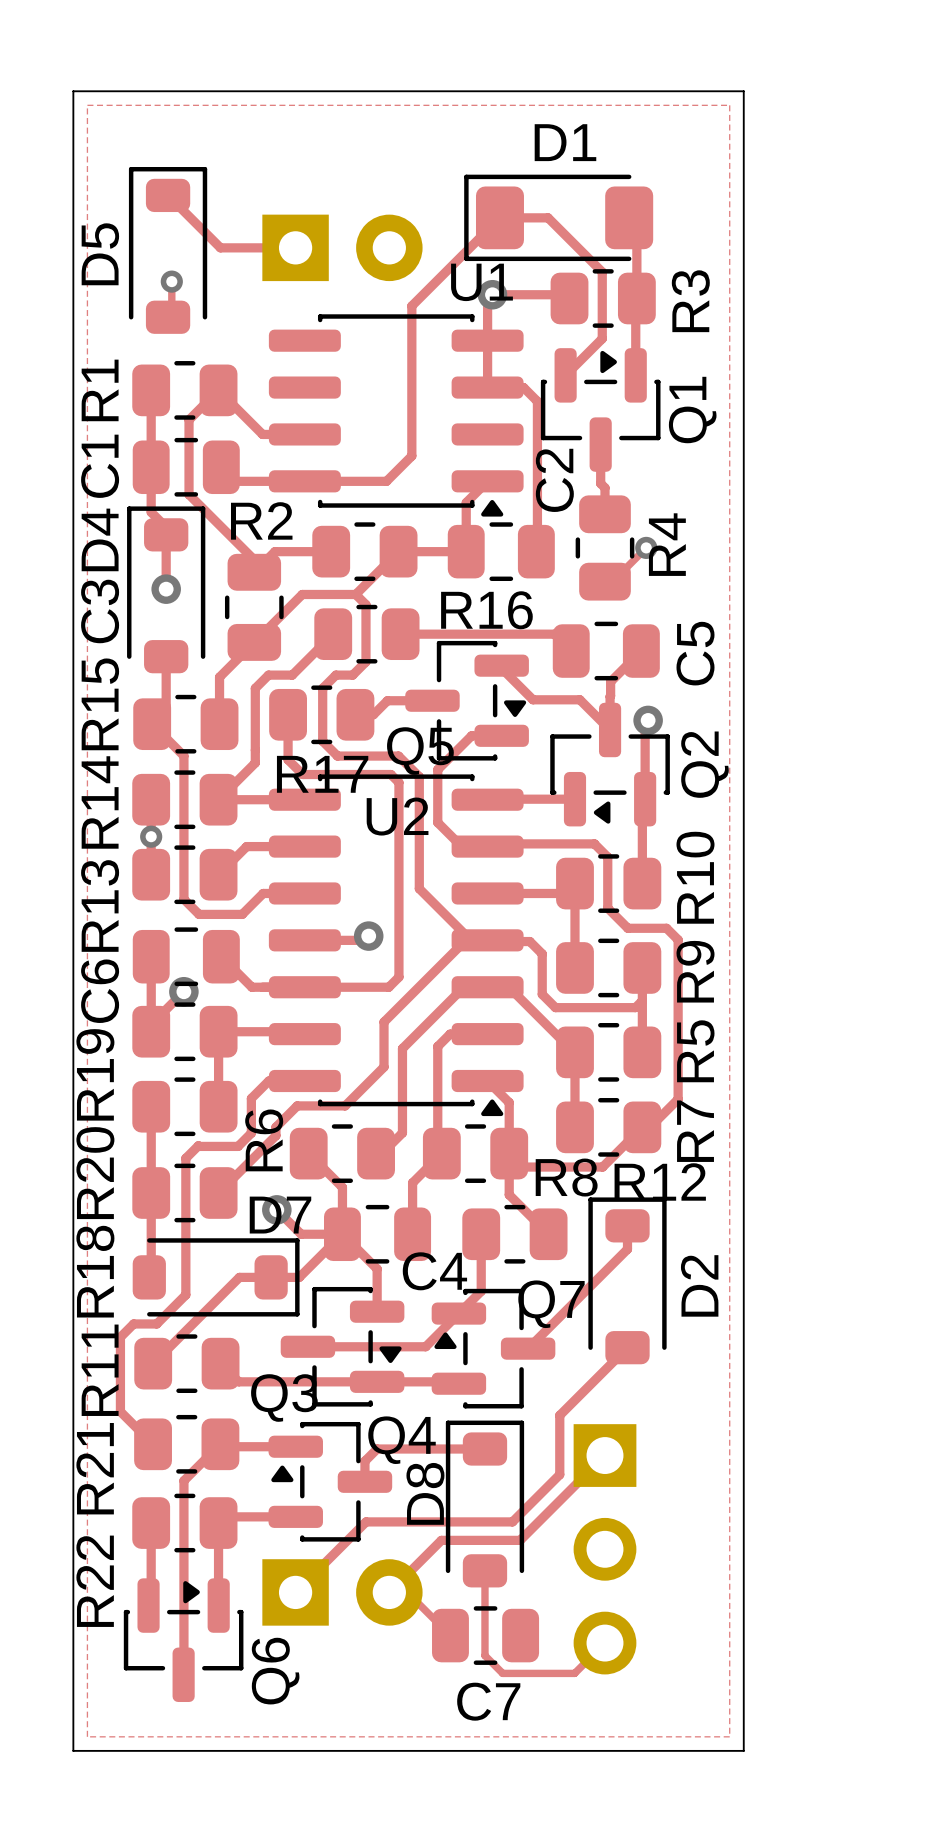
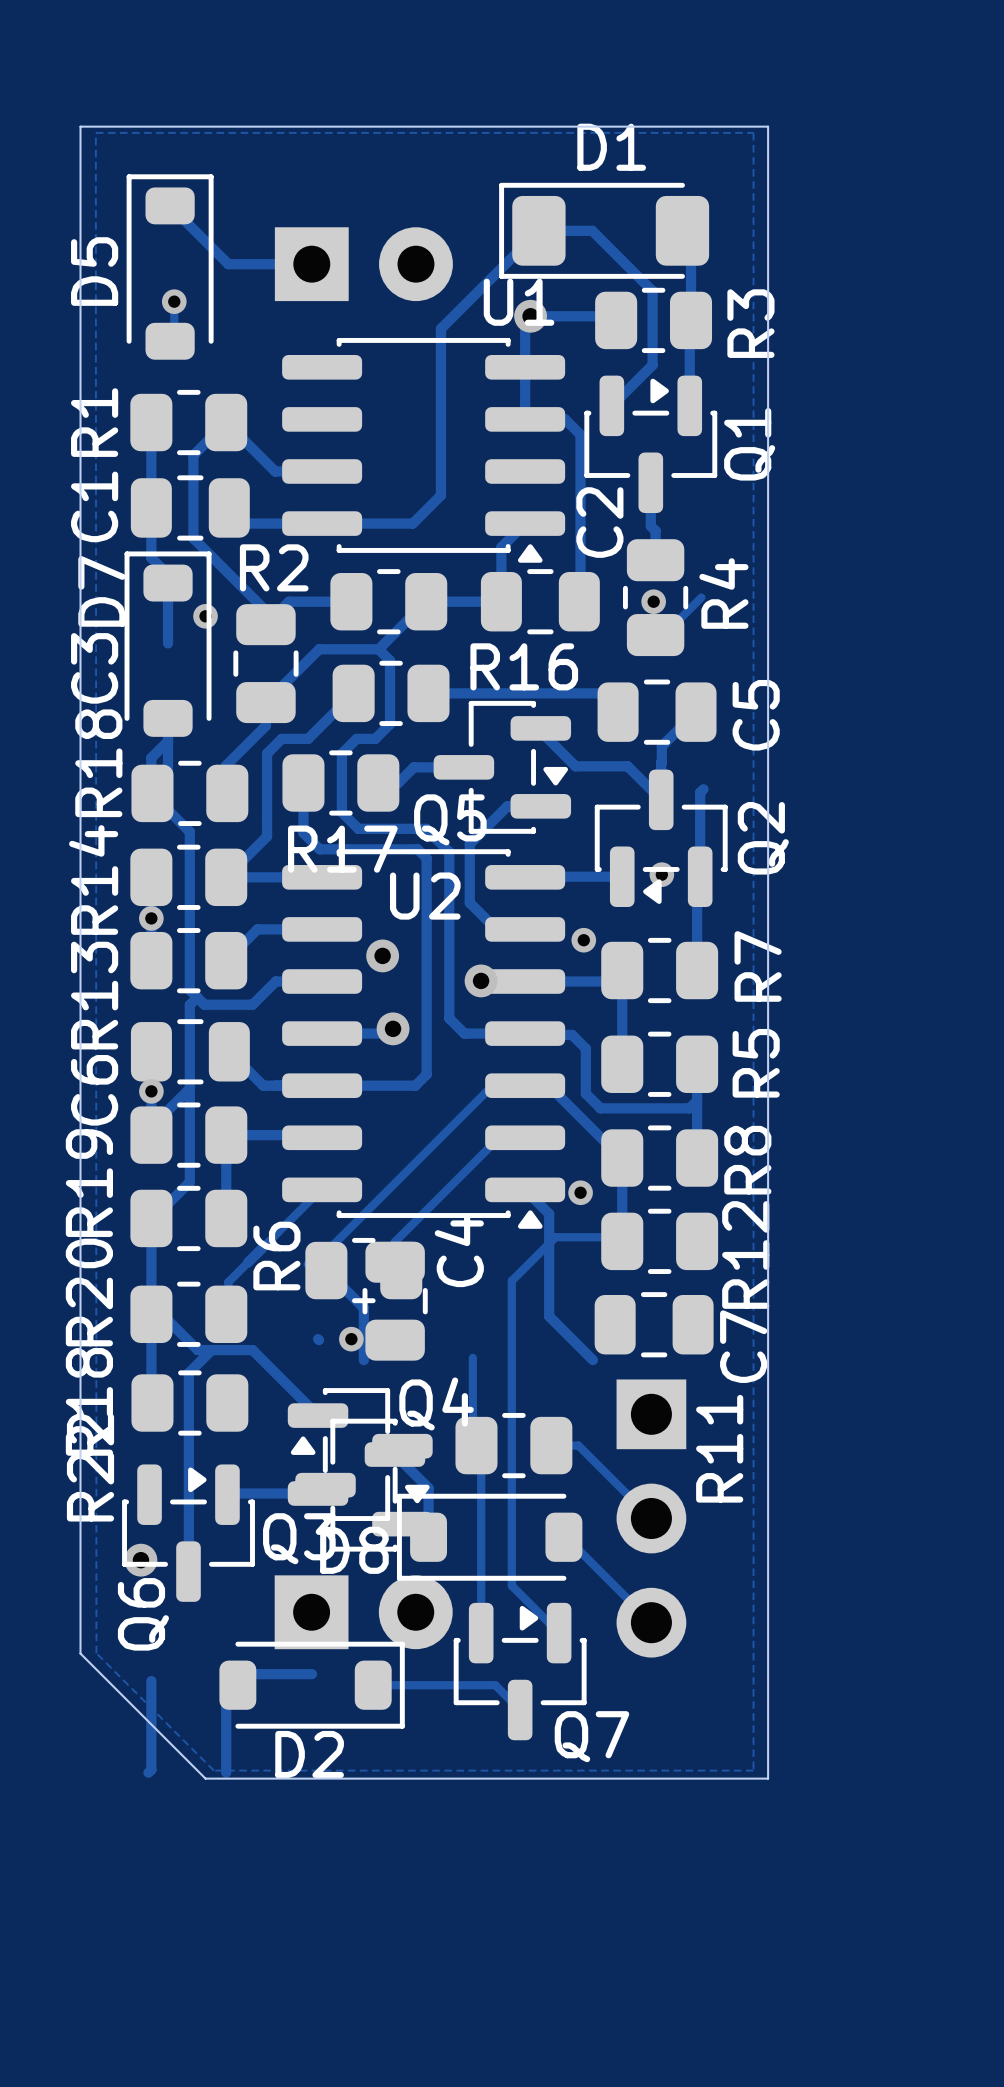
board edge: (73, 91) (743, 91) (743, 1750) (73, 1750) (73, 91) -> (80, 126) (80, 1653) (205, 1778) (768, 1778) (768, 126) (80, 126)
zone outline: (87, 105) (87, 1736) (729, 1736) (729, 105) (87, 105) -> (95, 132) (96, 1653) (213, 1770) (753, 1770) (753, 132) (95, 132)
D4 name: D4 (100, 539) -> D7 (101, 591)
via position: (646, 547) -> (653, 601)
via: none -> (205, 616)
via: (166, 589) -> none
track: (254, 642) (219, 677) (219, 724) -> (265, 702) (265, 725) (226, 765) (226, 793)
R15 name: R15 (100, 704) -> R18 (98, 763)
track: (142, 714) (183, 755) (183, 899) (185, 901) -> (168, 741) (151, 757) (151, 793) (189, 831) (189, 990)
via: (648, 720) -> none
via: none -> (661, 874)
track: (490, 843) (594, 843) (607, 857) (607, 908) (627, 928) (666, 928) (678, 939) (678, 1099) (650, 1127) (642, 1127) (602, 1167) (522, 1167) (509, 1153) -> none
via: none -> (583, 940)
via: none -> (382, 955)
R10 name: R10 (695, 877) -> R7 (758, 966)
track: (419, 888) (470, 940) -> (449, 976) (449, 1018) (464, 1033) (500, 1033)
via: none -> (481, 980)
track: none -> (197, 997) (189, 1004) (189, 1182) (153, 1218)
track: (465, 940) (384, 1022) (384, 1067) (345, 1105) (297, 1105) (275, 1127) (275, 1135) (218, 1193) -> none
R9 name: R9 (695, 971) -> R5 (756, 1063)
track: (463, 987) (402, 1048) (402, 1132) (381, 1153) (376, 1153) -> (498, 1085) (492, 1085) (313, 1264) (307, 1264)
via: (183, 991) -> none
via: none -> (151, 1091)
track: (464, 1034) (450, 1034) (437, 1046) (437, 1149) (441, 1153) (412, 1182) (412, 1234) -> (499, 1137) (395, 1241) (395, 1262)
R5 name: R5 (695, 1051) -> R8 (747, 1160)
track: (303, 1081) (268, 1081) (251, 1098) (251, 1133) -> (322, 1189) (228, 1282) (228, 1305)
via: none -> (580, 1192)
track: none -> (618, 1237) (555, 1237) (511, 1280) (511, 1585) (559, 1633)
R7 name: R7 (695, 1131) -> R12 (745, 1254)
track: (238, 1146) (198, 1145) (185, 1158) (185, 1294) (156, 1323) (133, 1323) (120, 1337) (120, 1411) (153, 1444) -> none
R8: (475, 1153) -> none
track: none -> (153, 1305) (197, 1350) (252, 1350) (318, 1415)
track: (276, 1209) (301, 1234) (342, 1234) -> none
via: (276, 1209) -> none
track: none -> (318, 1339) (319, 1340)
via: none -> (351, 1339)
track: none -> (211, 1350) (188, 1372) (188, 1571)
track: (627, 1225) (627, 1249) (528, 1348) -> none
track: none -> (472, 1357) (472, 1441) (481, 1452) (481, 1633)
track: (342, 1234) (377, 1268) (377, 1311) -> none
track: (342, 1234) (299, 1277) (239, 1277) (153, 1363) -> none
C4 rotation: 0° (377, 1234) -> 90° clockwise (395, 1301)
track: (481, 1234) (481, 1291) (425, 1346) (307, 1346) -> none
R12: (514, 1234) -> none
C4 name position: C4 (434, 1271) -> C4 (459, 1250)
D7: (216, 1277) -> none
D2 rotation: 0° (627, 1280) -> 90° clockwise (312, 1685)
D2 position: (627, 1280) -> (312, 1685)
track: none -> (551, 1445) (578, 1445) (651, 1518)
track: none -> (394, 1454) (428, 1488) (428, 1537)
track: (627, 1347) (559, 1415) (559, 1474) (512, 1521) (366, 1521) (295, 1592) -> none
Q7 rotation: 0° (493, 1348) -> 90° clockwise (520, 1671)
Q7 position: (493, 1348) -> (520, 1671)
track: none -> (318, 1493) (227, 1494)
R11 position: (186, 1363) -> (513, 1445)
track: (220, 1363) (238, 1381) (457, 1381) (458, 1383) -> none
R11 name position: R11 (100, 1370) -> R11 (719, 1448)
track: none -> (563, 1537) (651, 1622)
via: none -> (140, 1560)
R21: (186, 1444) -> none
track: (295, 1446) (222, 1446) (220, 1444) (183, 1480) (183, 1674) -> none
track: (484, 1449) (377, 1449) (364, 1461) (364, 1481) -> none
track: (605, 1455) (520, 1540) (441, 1540) (389, 1592) (407, 1592) (450, 1635) -> none
Q4 position: (330, 1481) -> (356, 1454)
D8 rotation: 0° (484, 1504) -> 90° counterclockwise (489, 1537)
D8 position: (484, 1504) -> (489, 1537)
R22 position: (184, 1523) -> (189, 1403)
track: none -> (373, 1685) (495, 1685) (520, 1710)
part position: (605, 1549) -> (651, 1518)
track: (484, 1570) (484, 1655) (502, 1673) (574, 1673) (605, 1643) -> none
part position: (342, 1592) -> (363, 1612)
C7 position: (485, 1635) -> (654, 1324)
Q6 position: (183, 1640) -> (188, 1533)
Q6 name position: Q6 (275, 1671) -> Q6 (143, 1614)
C7 name rotation: 0° (488, 1701) -> 90° counterclockwise (743, 1346)
C7 name position: C7 (488, 1701) -> C7 (743, 1346)

